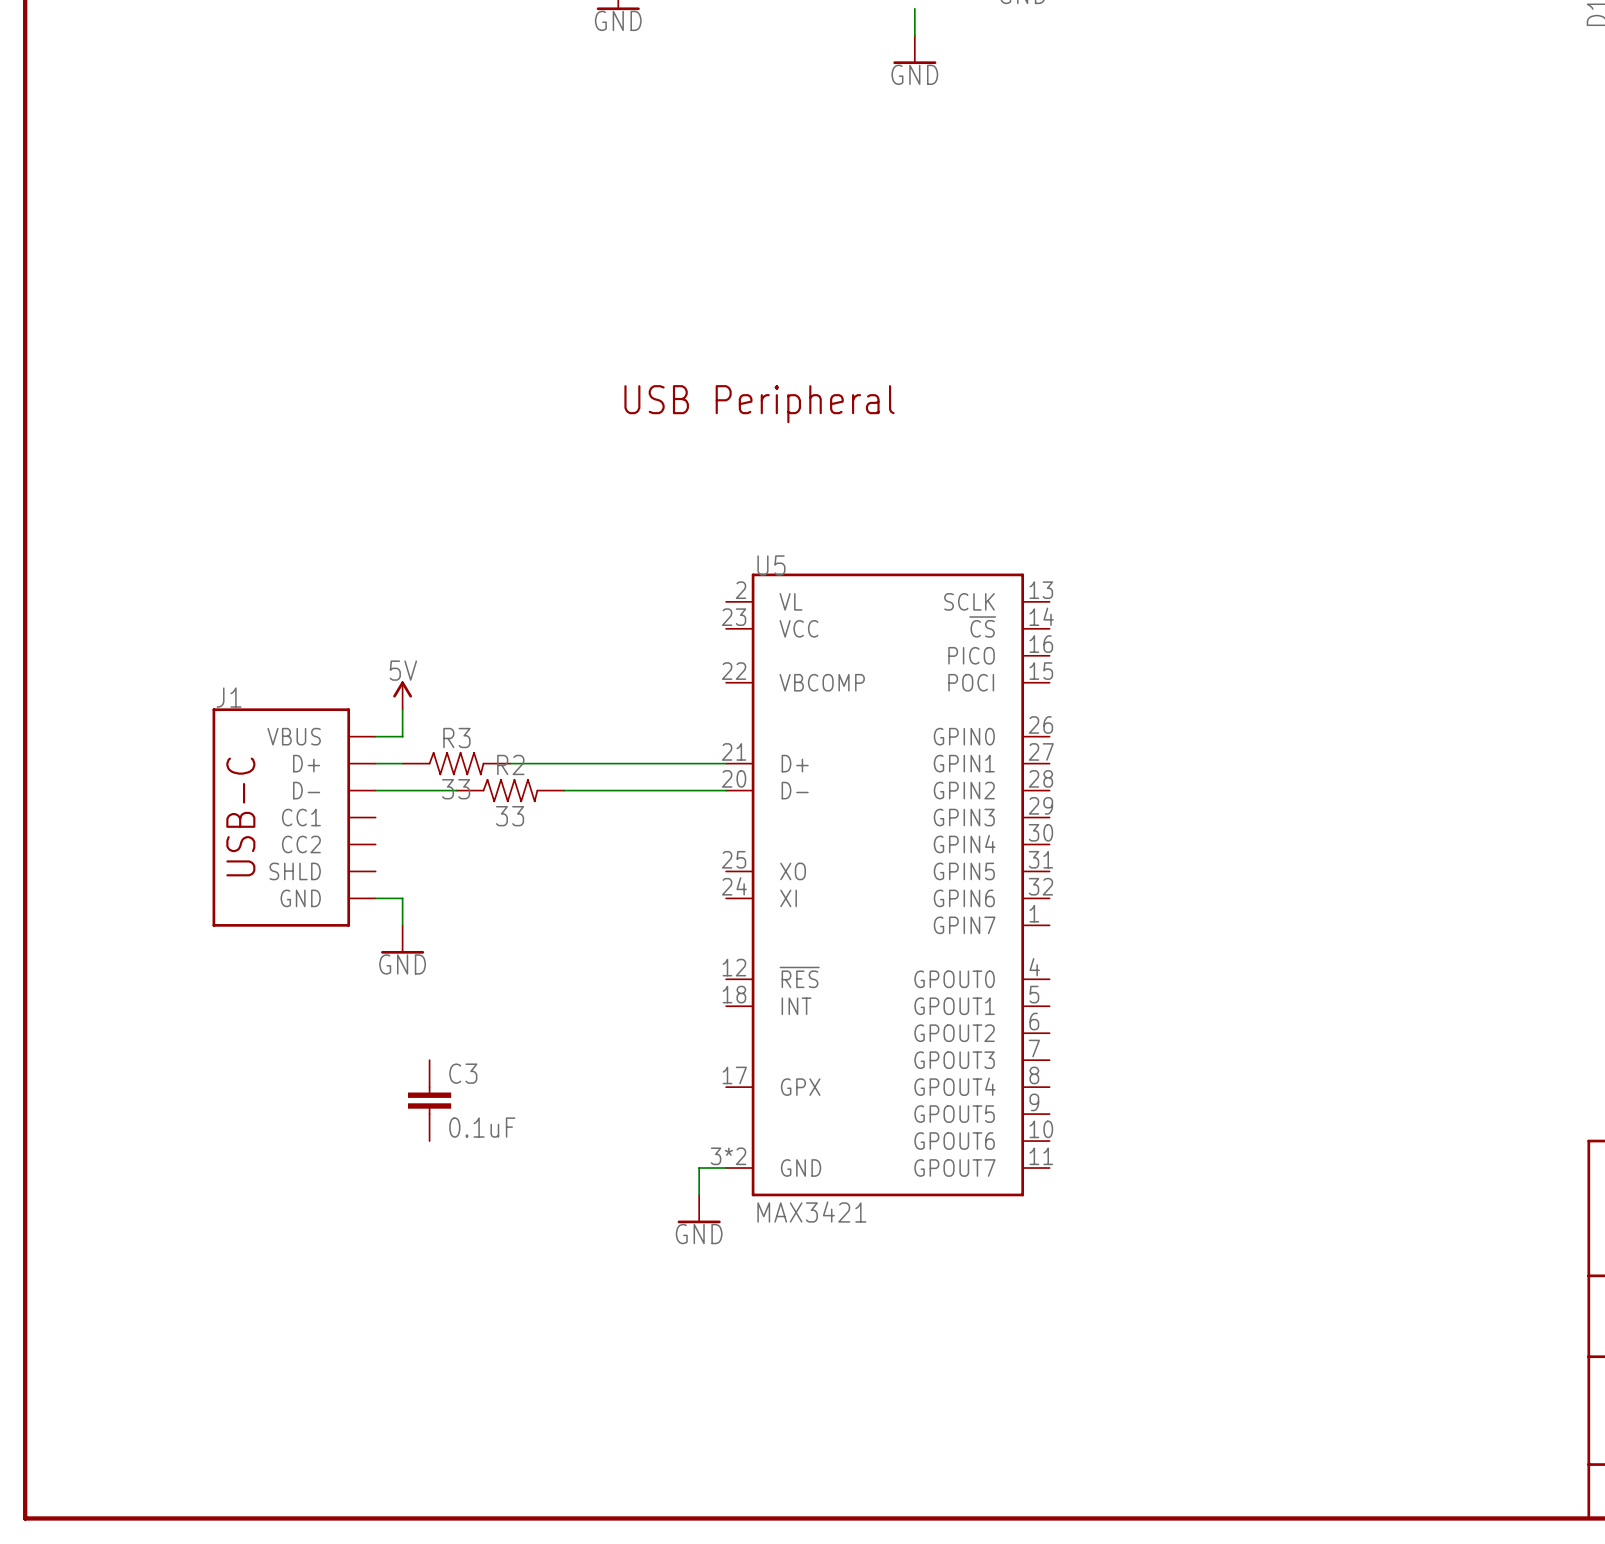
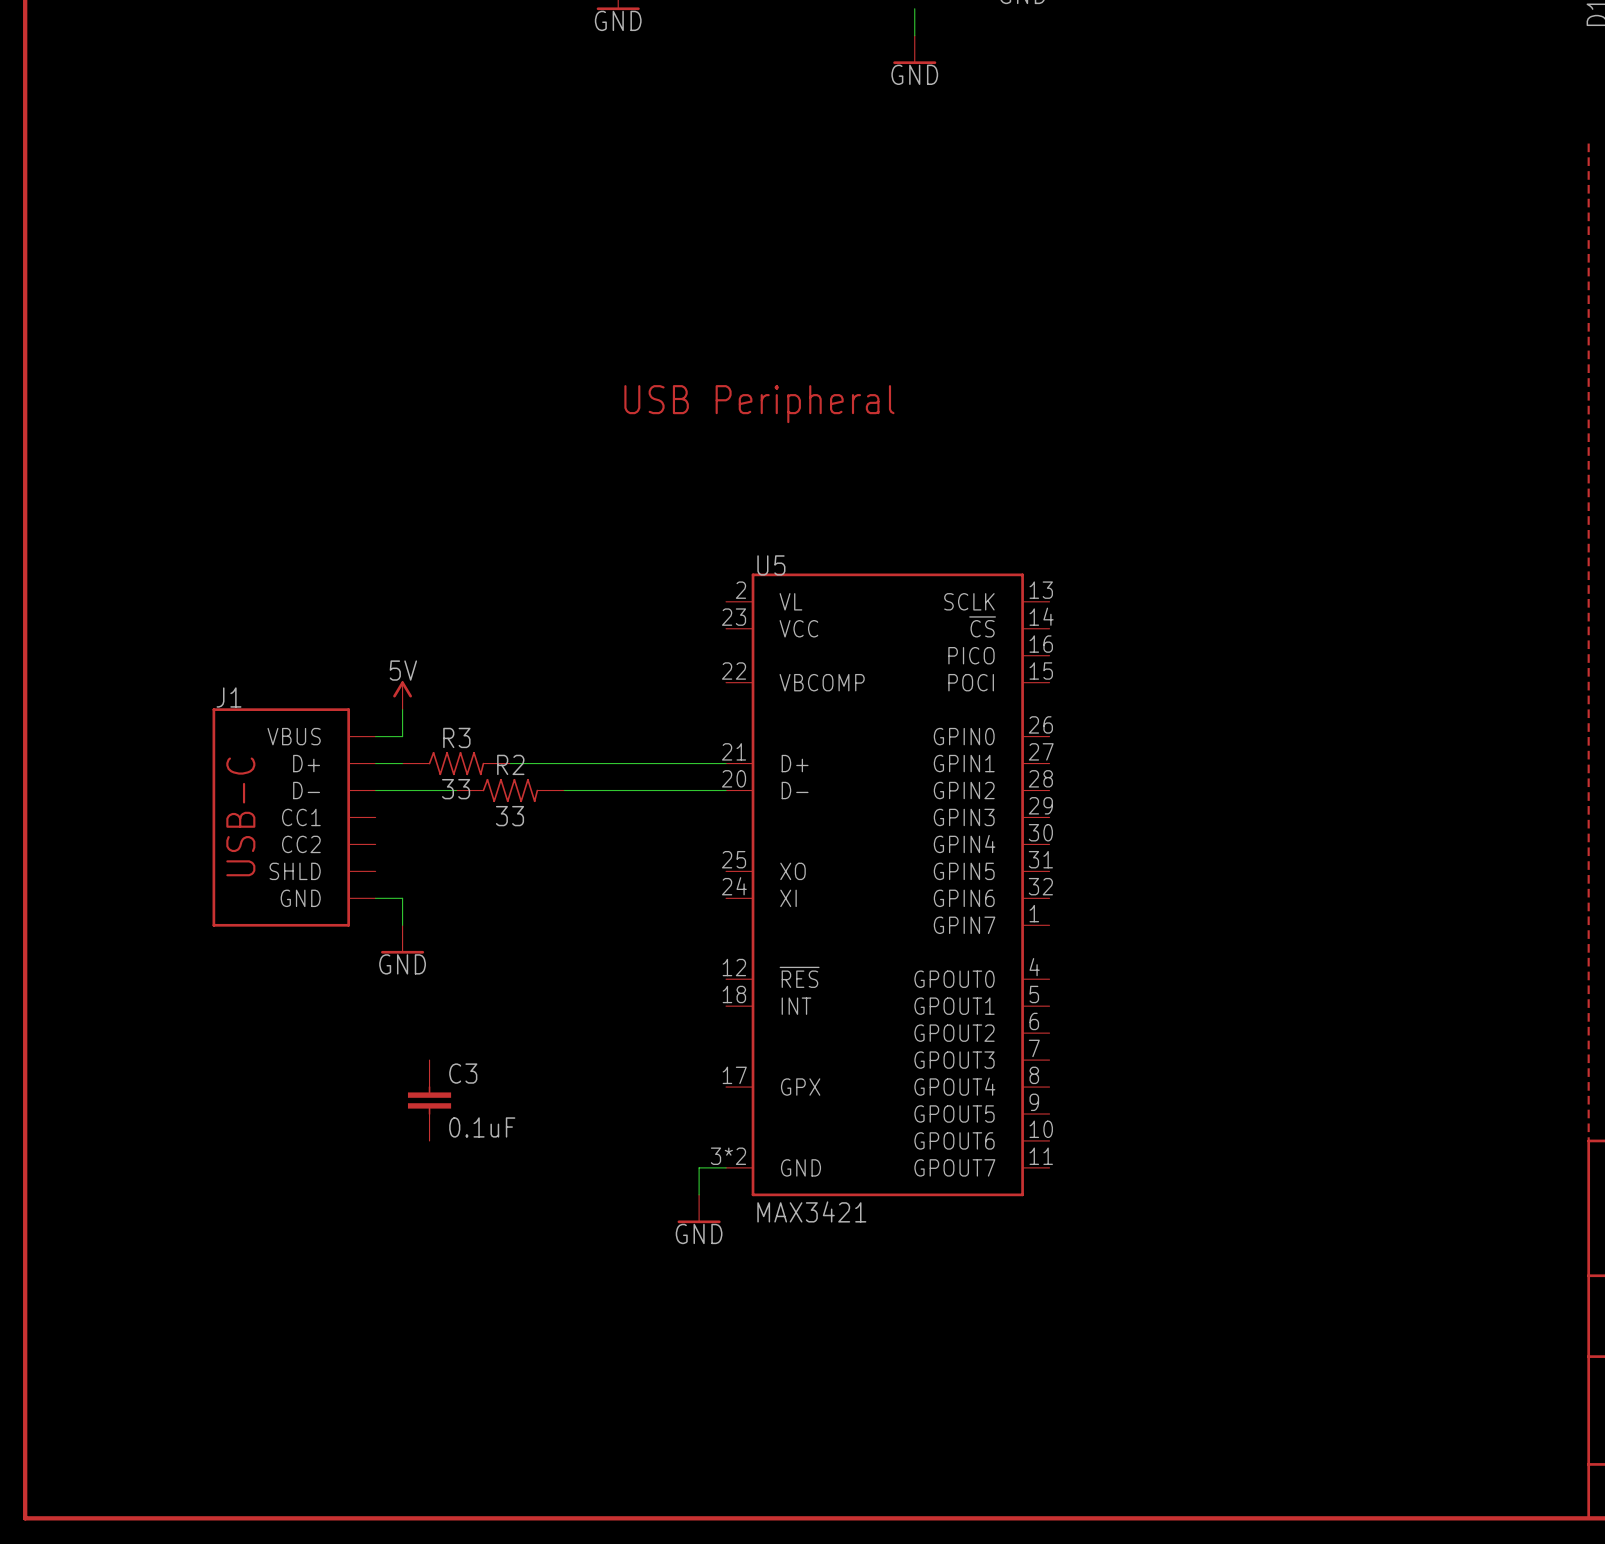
line: none -> (1588, 143) (1588, 1140)

